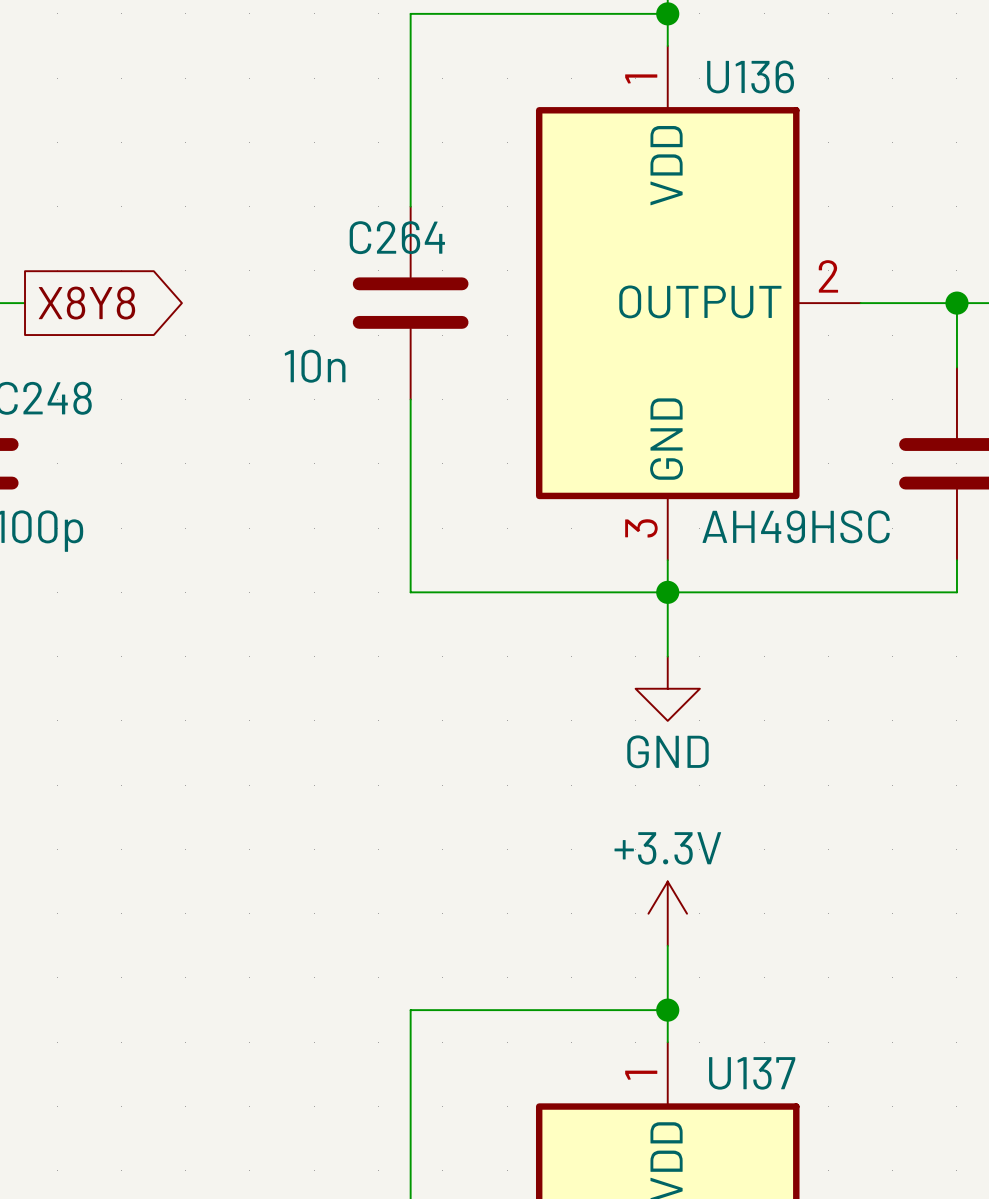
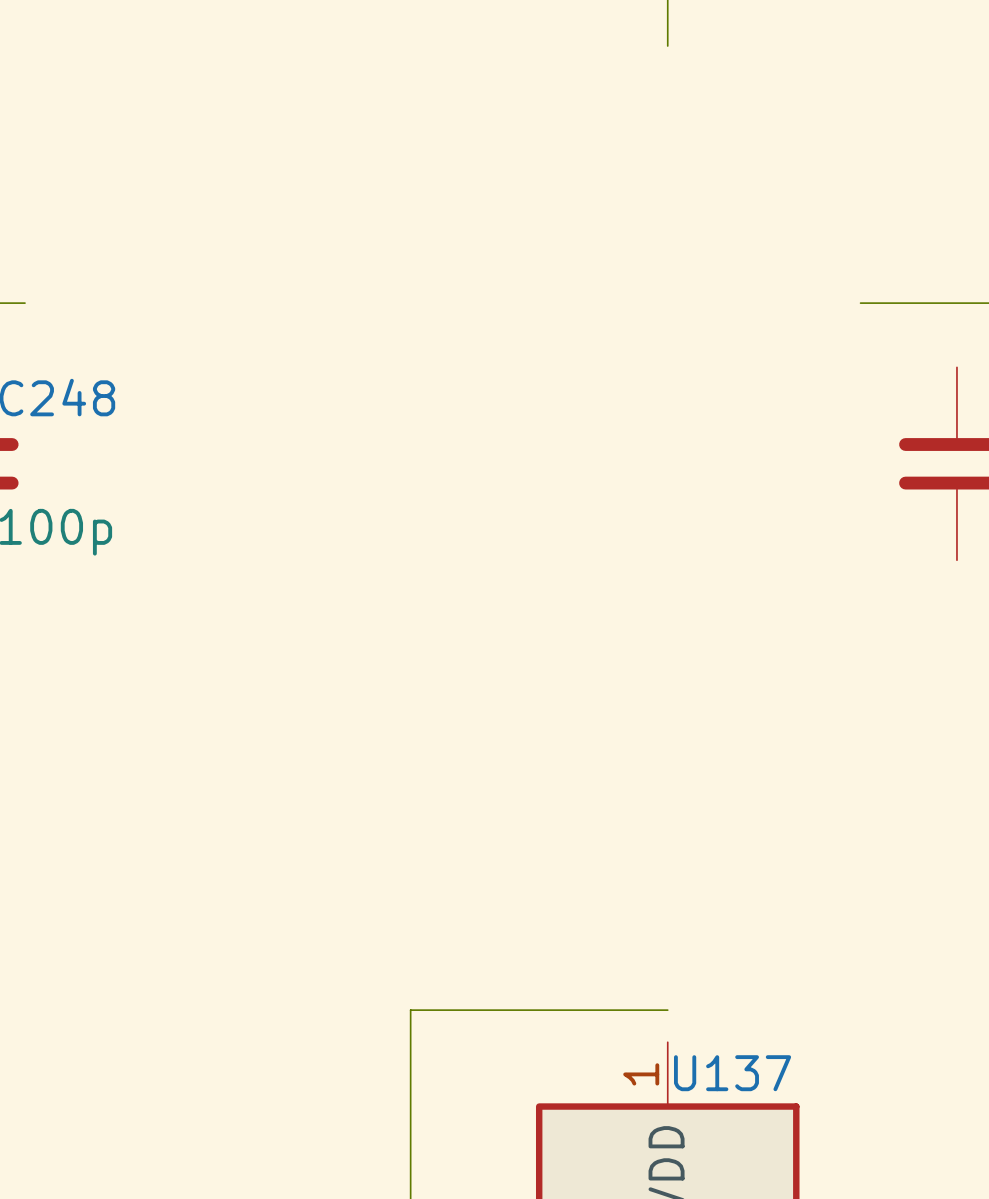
wire: (667, 13) (410, 13) (410, 206) -> none
junction: (667, 13) -> none
global label: X8Y8 (86, 303) -> none
C264: 10n (410, 303) -> none
U136: AH49HSC (698, 303) -> none
wire: (956, 303) (956, 367) -> none
junction: (956, 303) -> none
wire: (410, 399) (410, 592) (956, 592) (956, 560) -> none
wire: (667, 560) (667, 656) -> none
junction: (667, 592) -> none
power symbol: GND (667, 688) -> none
power symbol: +3.3V (667, 913) -> none
wire: (667, 945) (667, 1042) -> none
junction: (667, 1010) -> none

